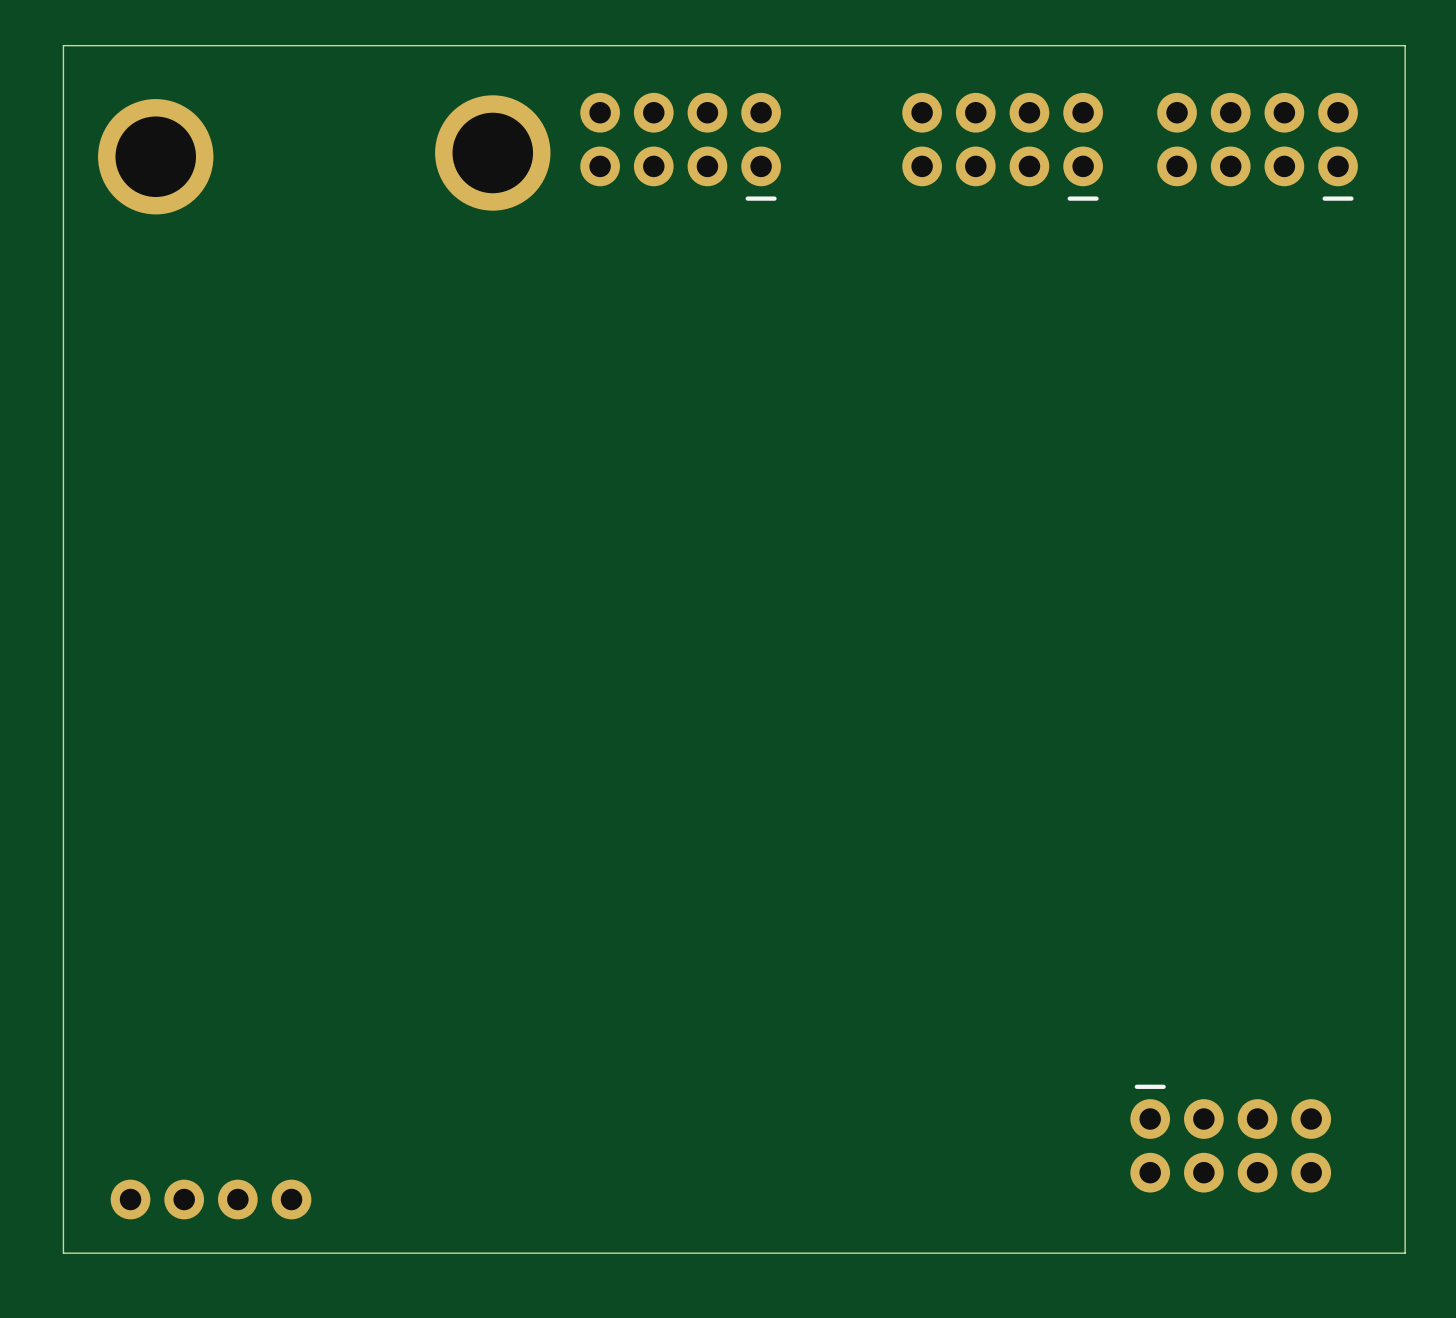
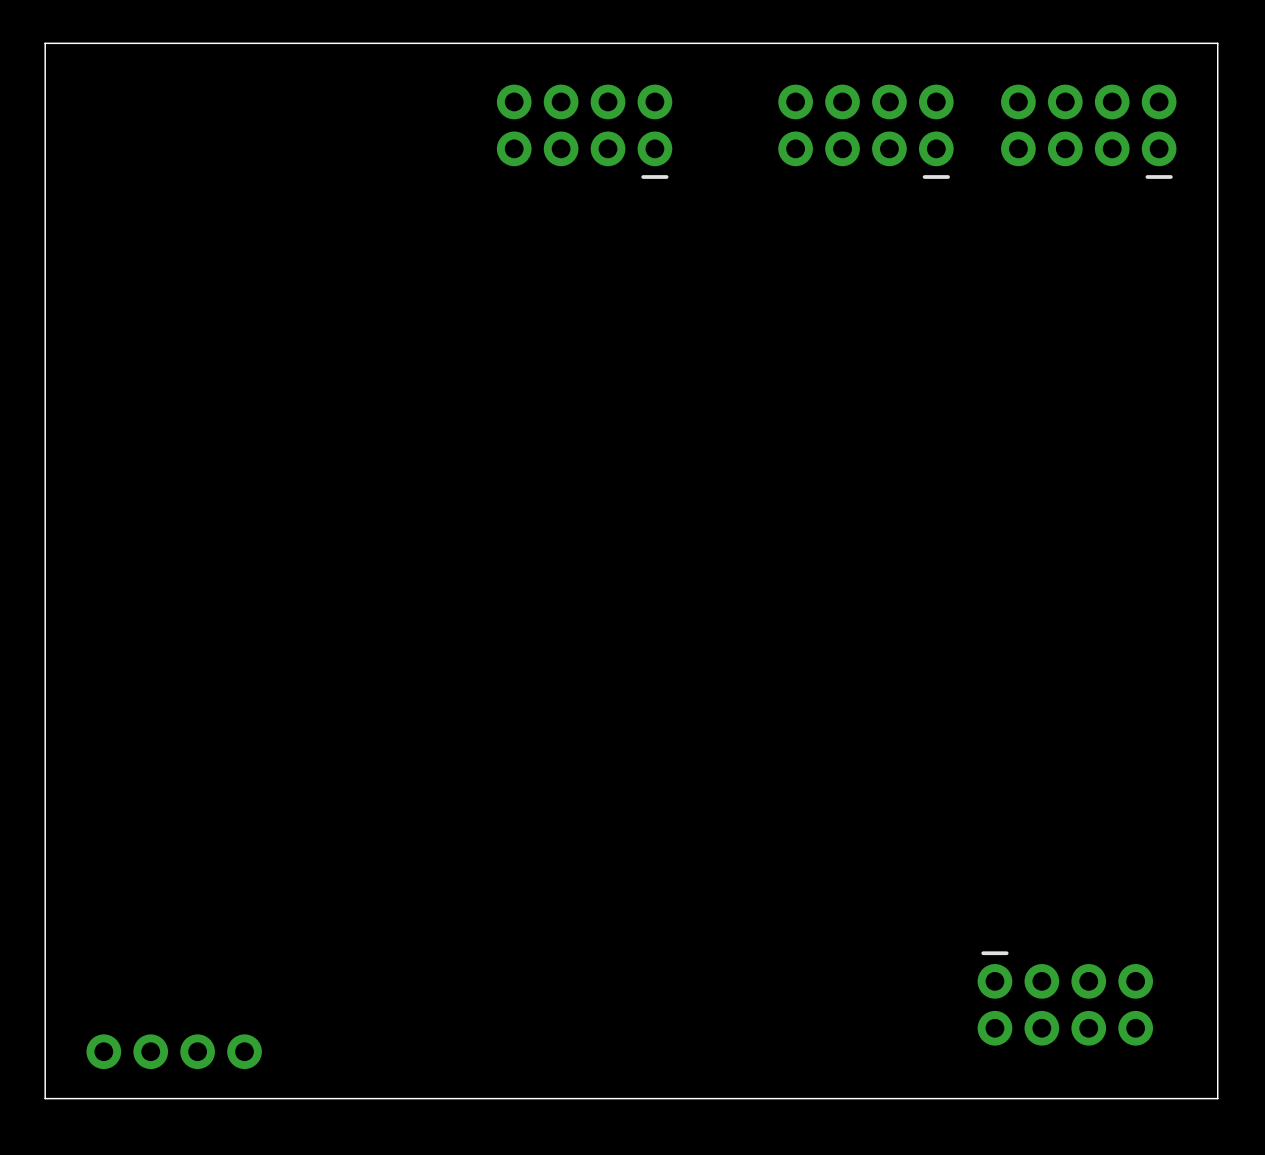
part: (492, 152) -> none
part: (155, 156) -> none

